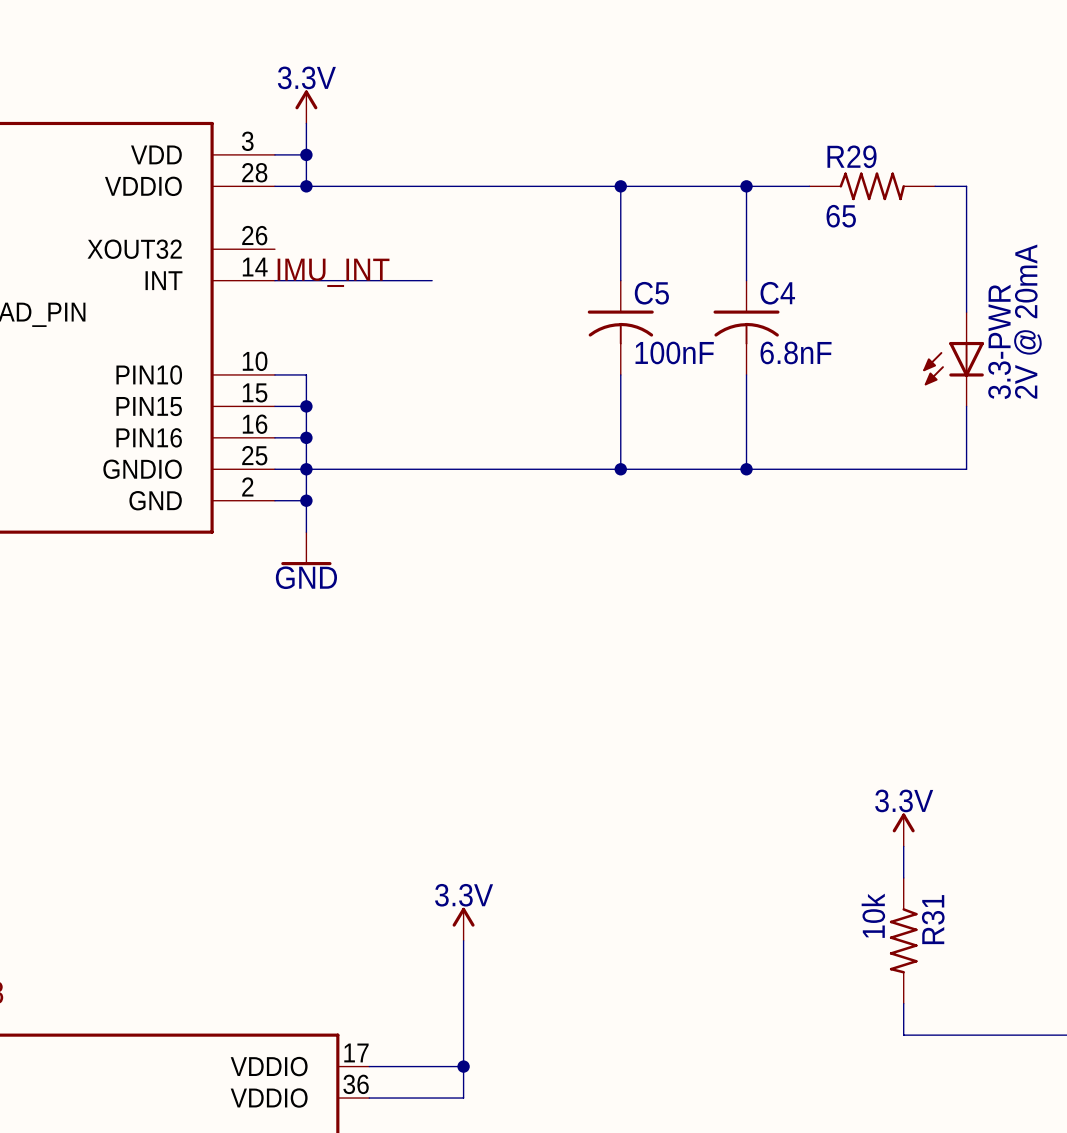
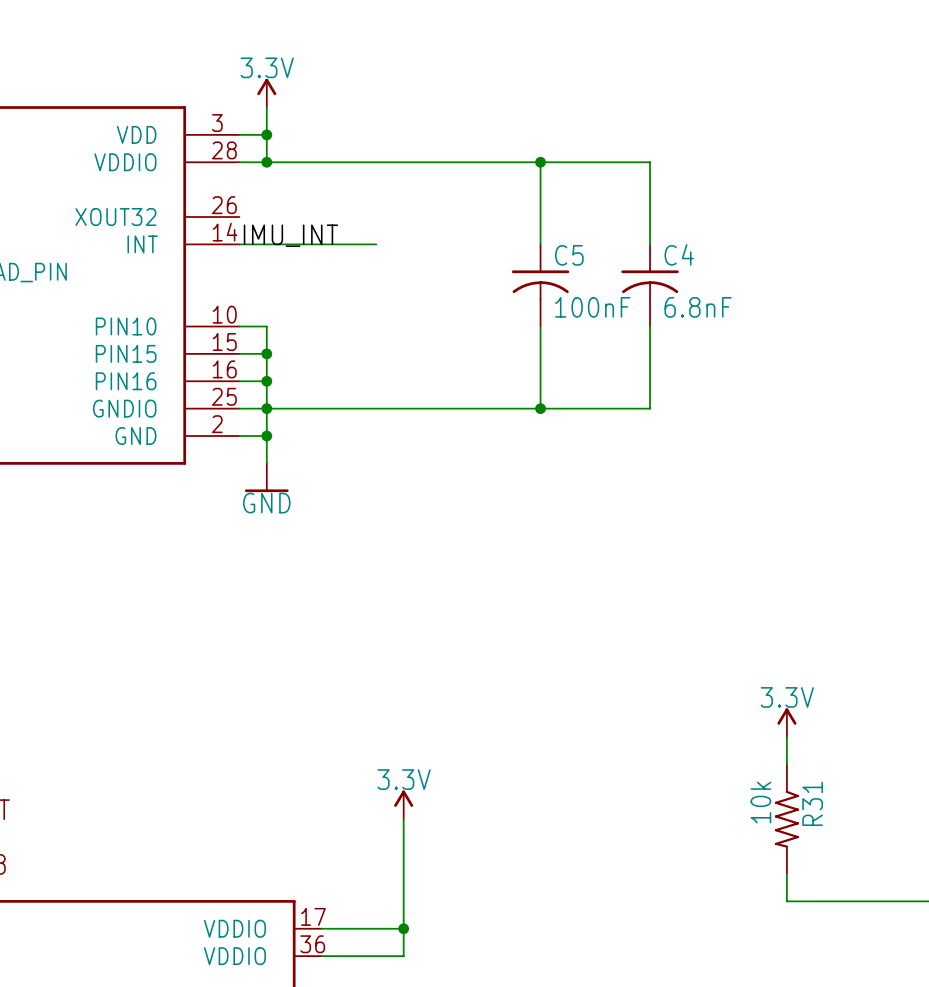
wire: (746, 186) (809, 186) -> none
junction: (746, 186) -> none
R29: 65 (872, 186) -> none
wire: (935, 186) (966, 186) (966, 312) -> none
3.3-PWR: 2V @ 20mA (953, 359) -> none
wire: (966, 406) (966, 469) (746, 469) -> none
junction: (746, 469) -> none

